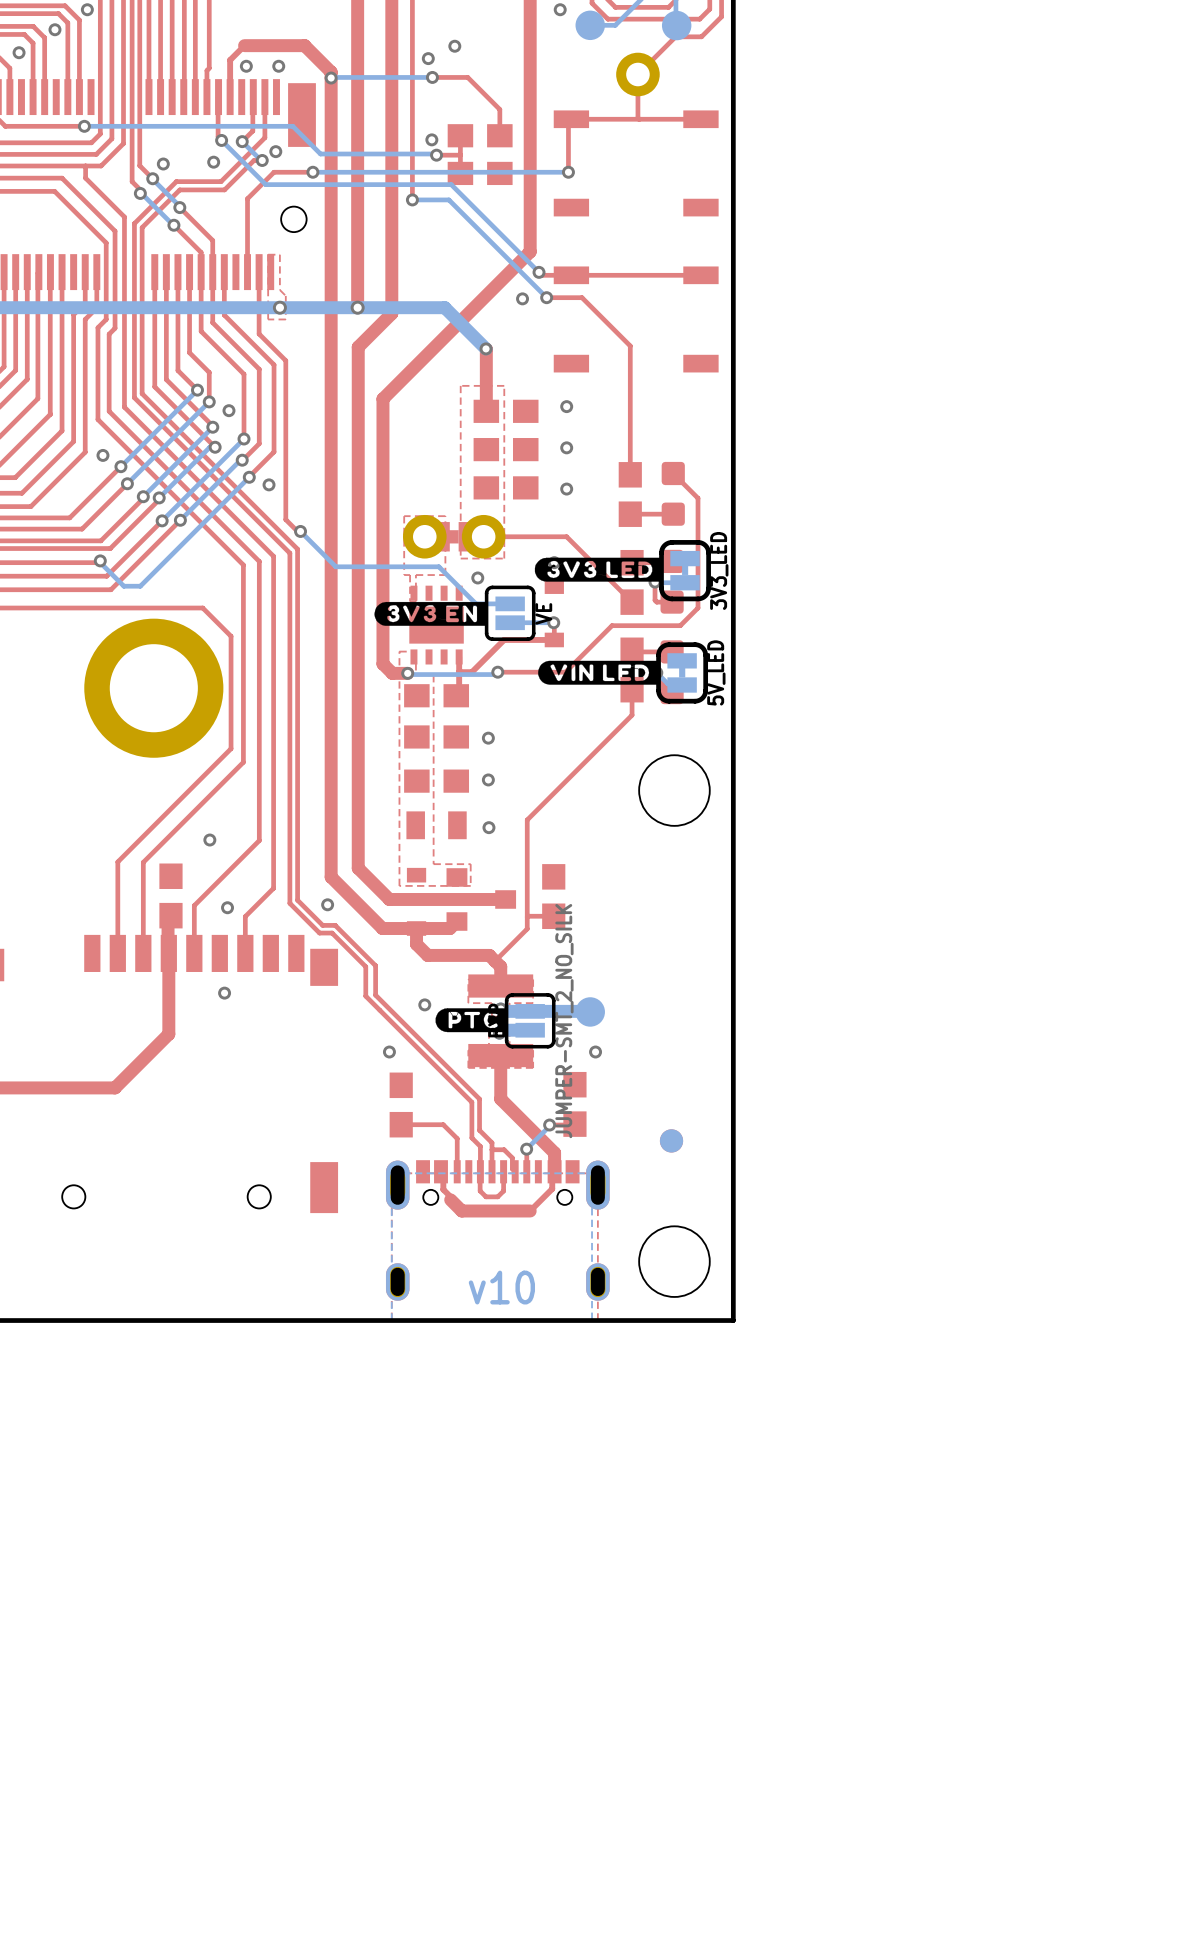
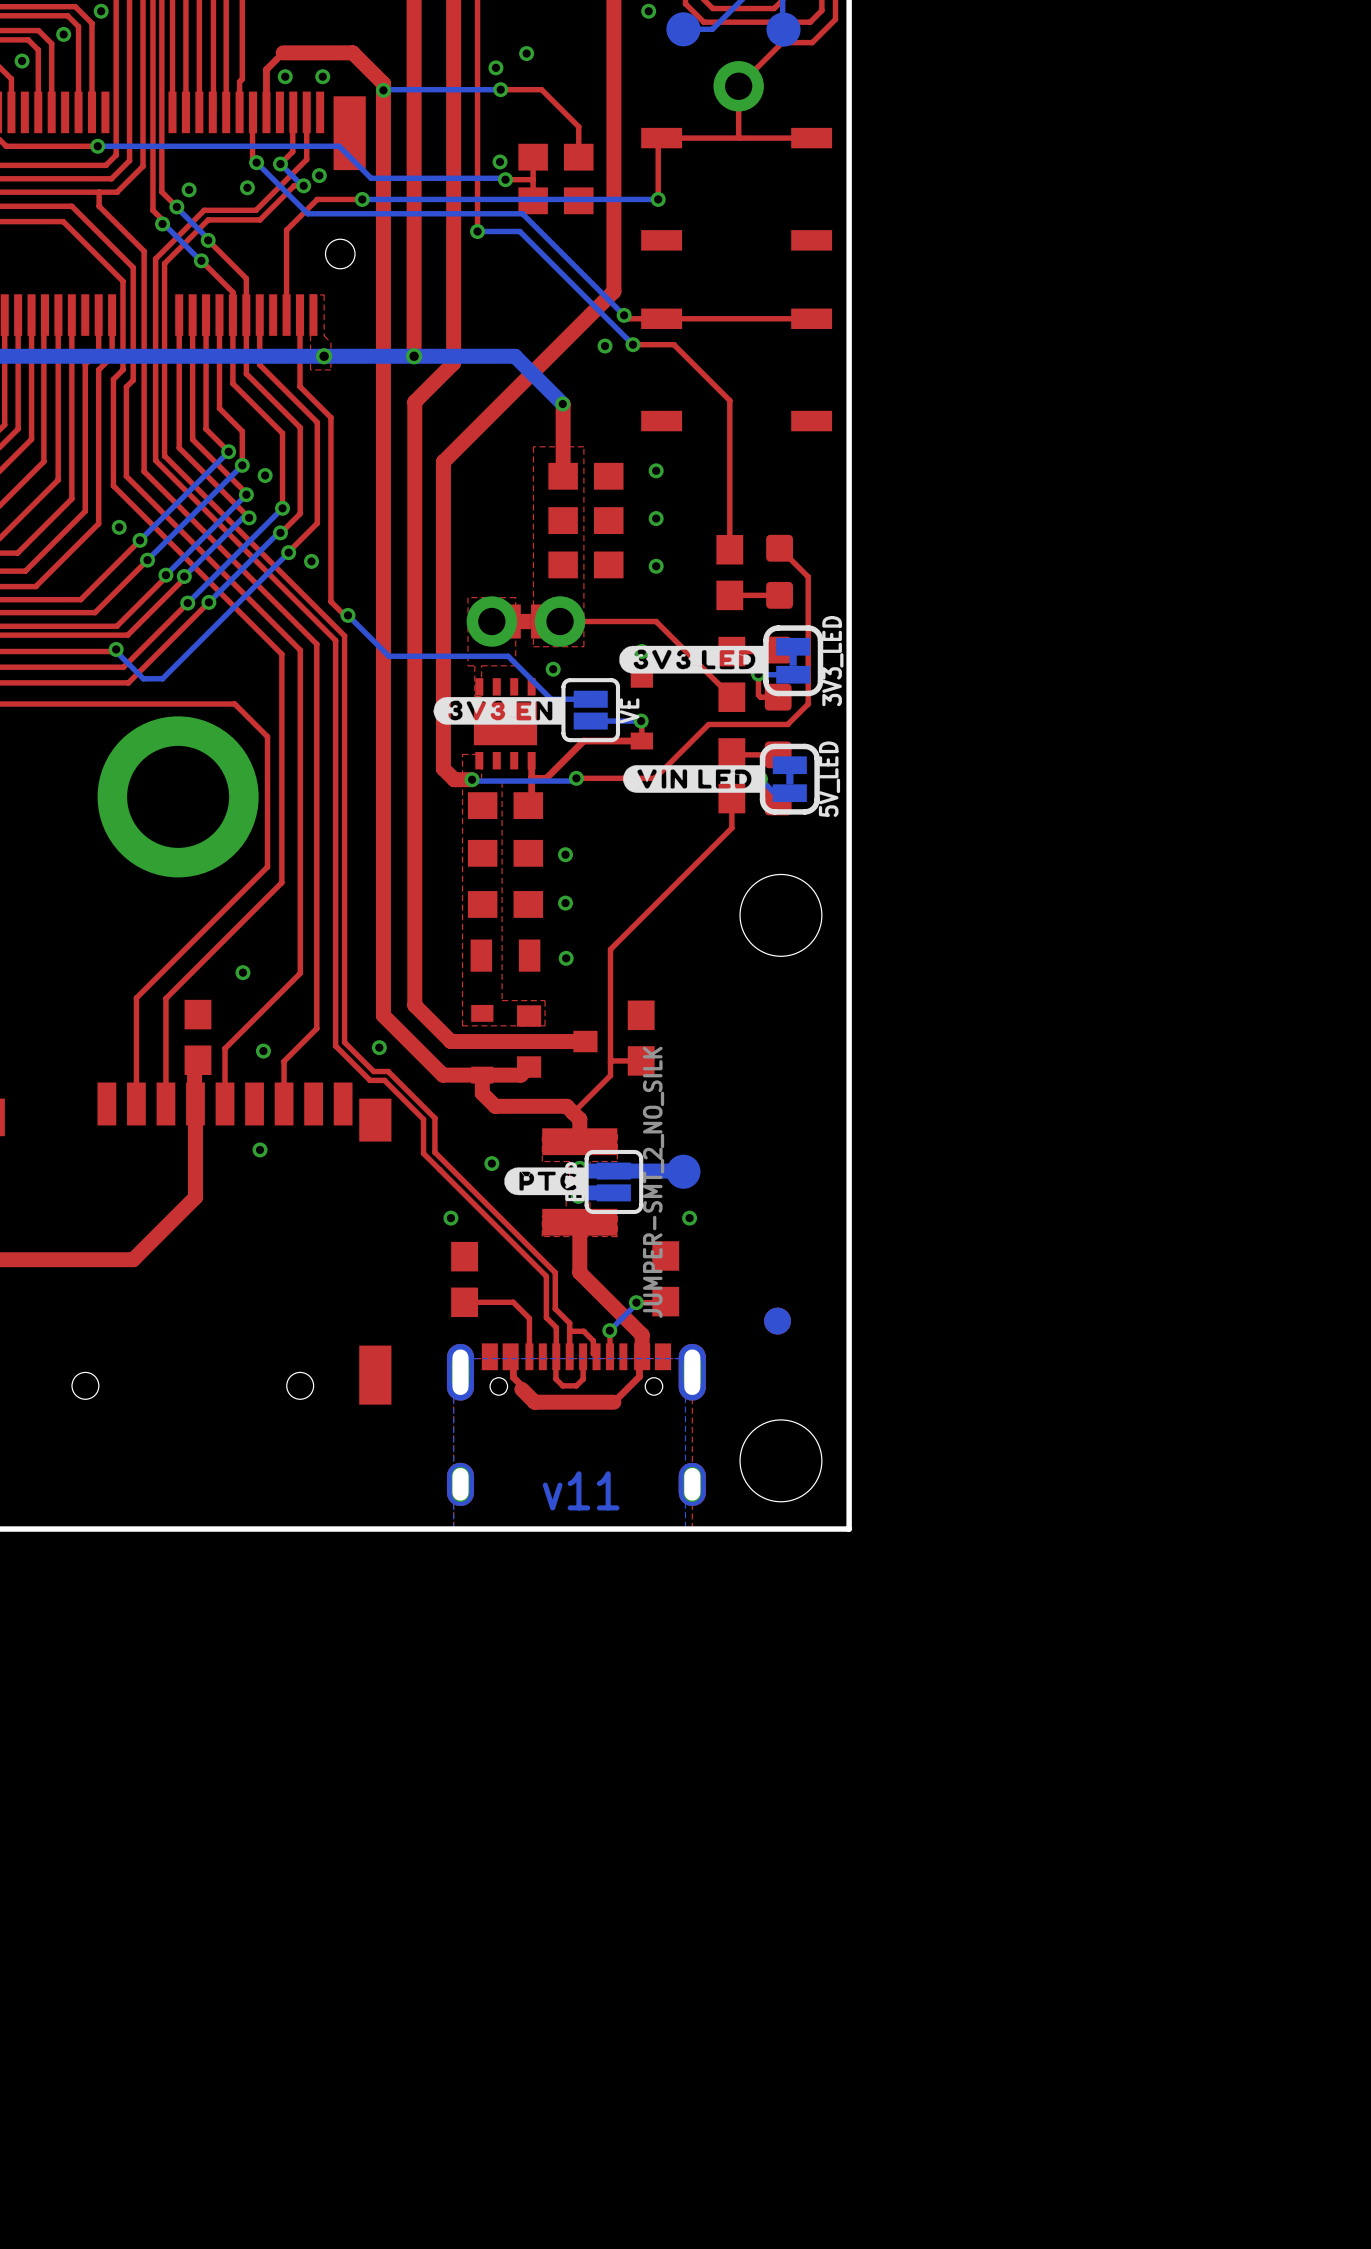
text: v10 (501, 1287) -> v11 (581, 1490)

